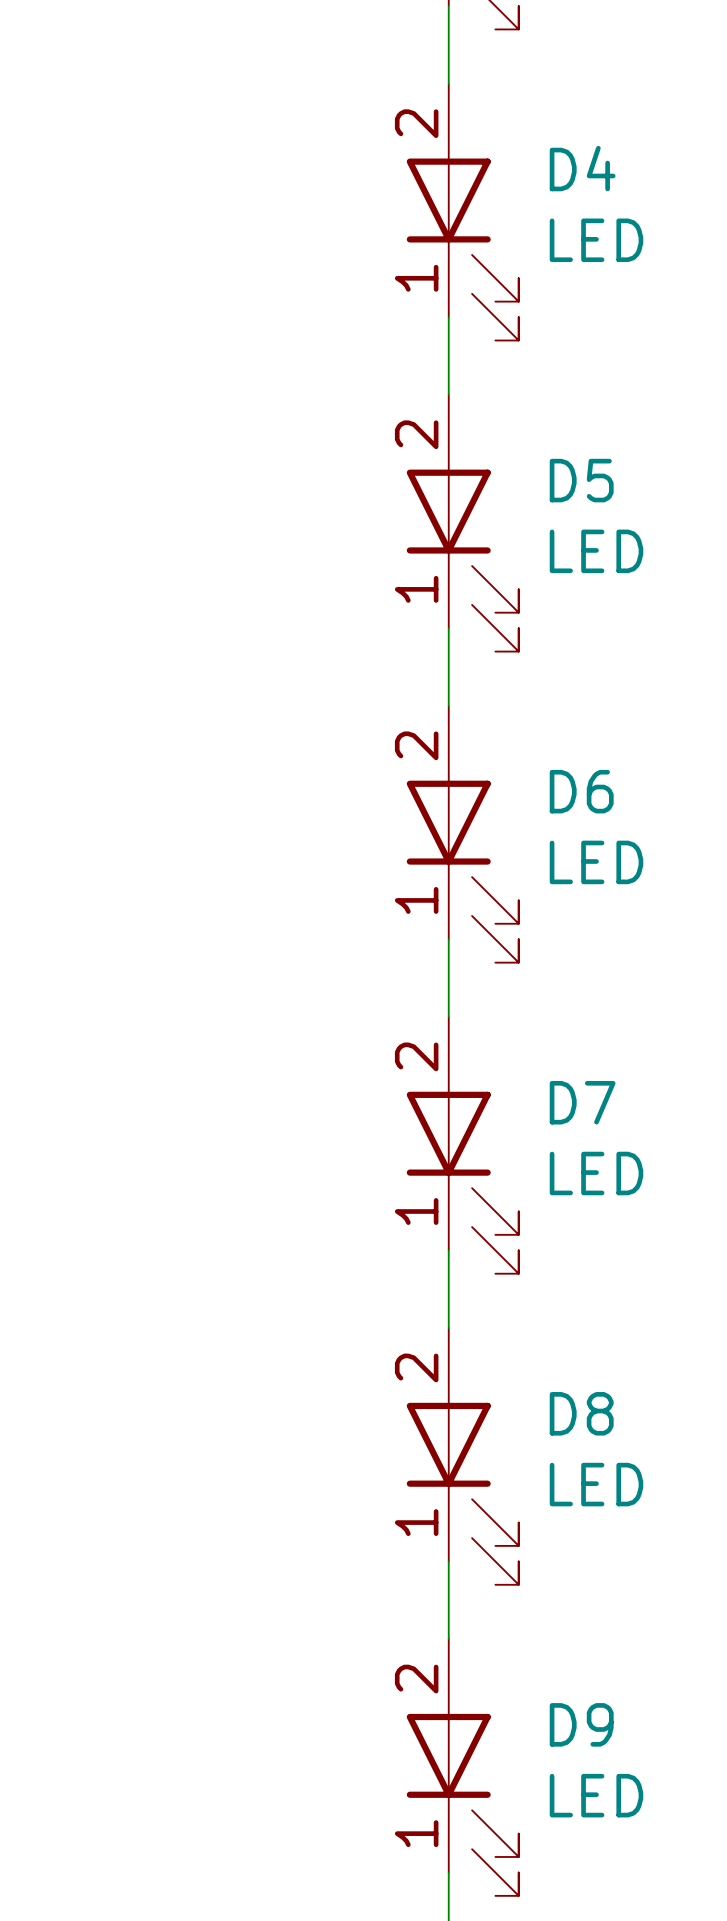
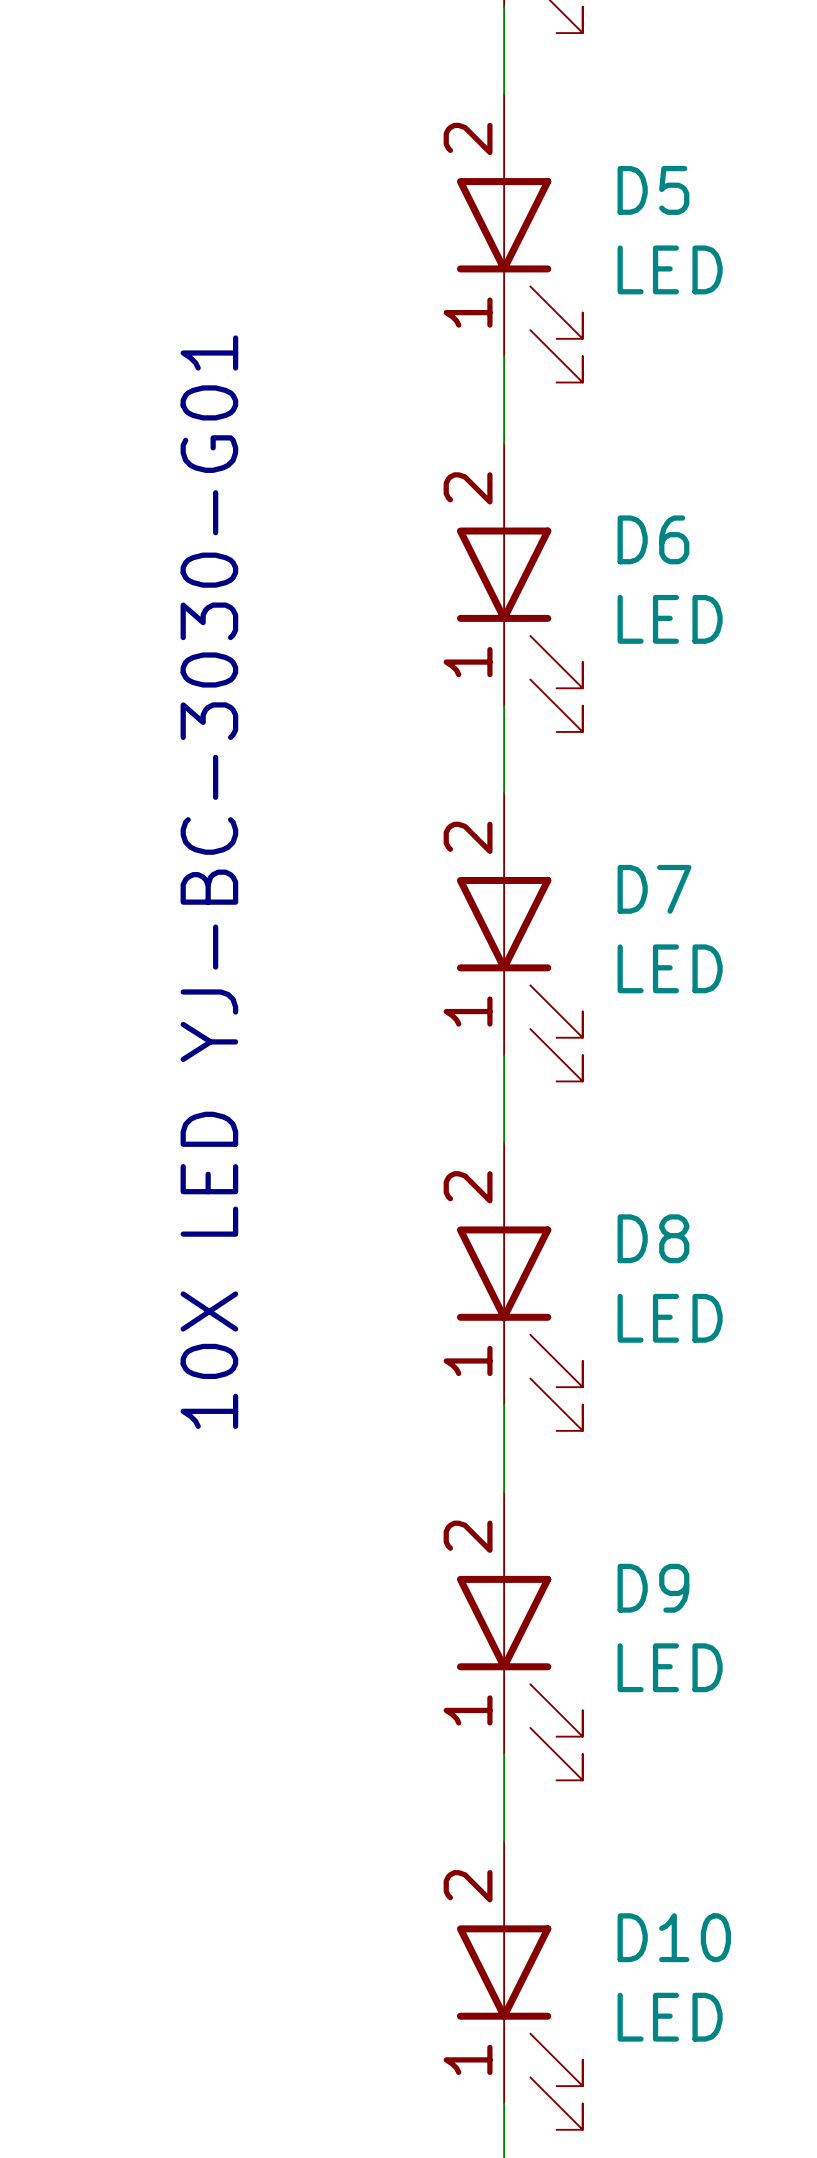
D4 name: D4 (582, 168) -> D5 (653, 190)
D5 name: D5 (581, 480) -> D6 (653, 539)
text: none -> 10X LED YJ-BC-3030-G01 (209, 882)
D6 name: D6 (581, 791) -> D7 (654, 889)
D7 name: D7 (582, 1102) -> D8 (653, 1238)
D8 name: D8 (581, 1413) -> D9 (653, 1588)
D9 name: D9 (581, 1724) -> D10 (674, 1937)

